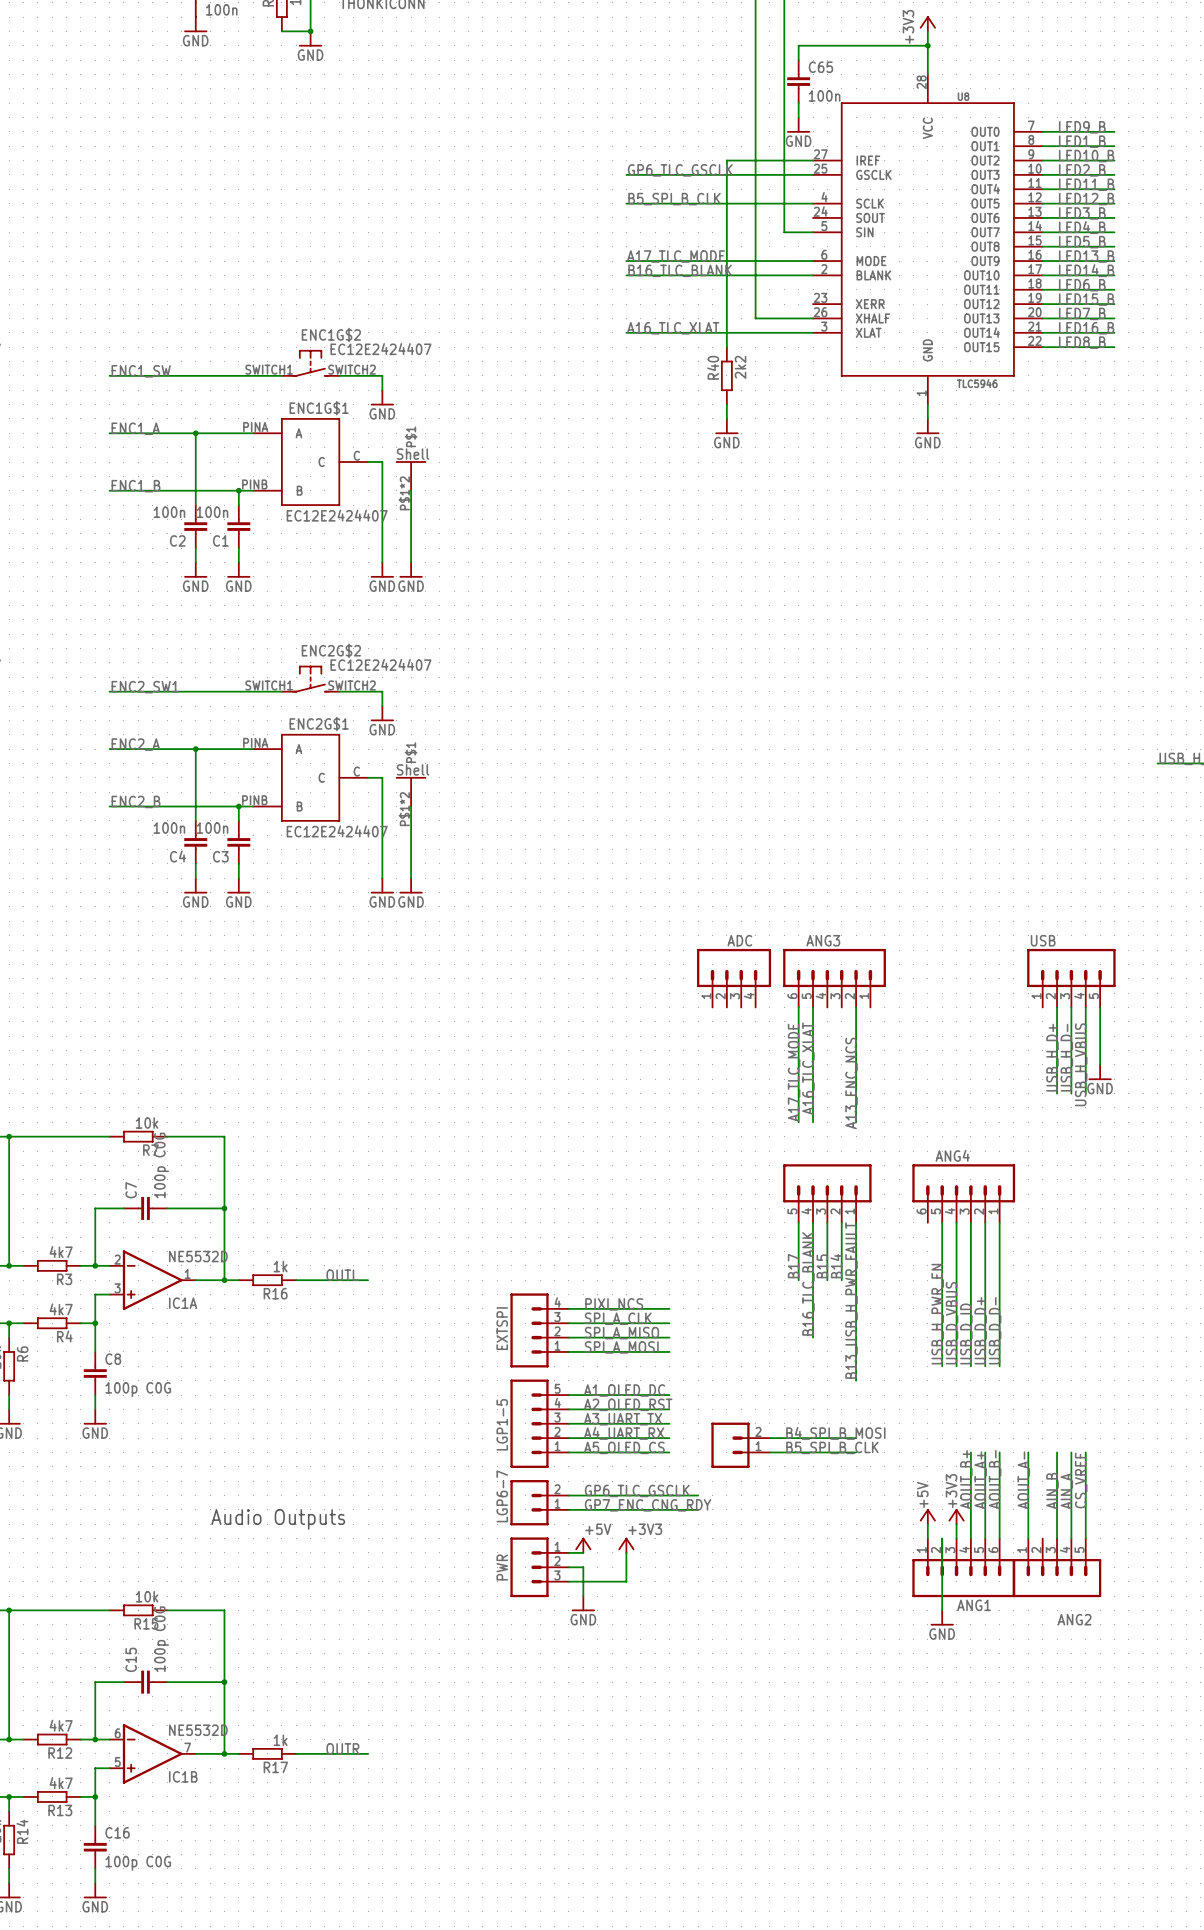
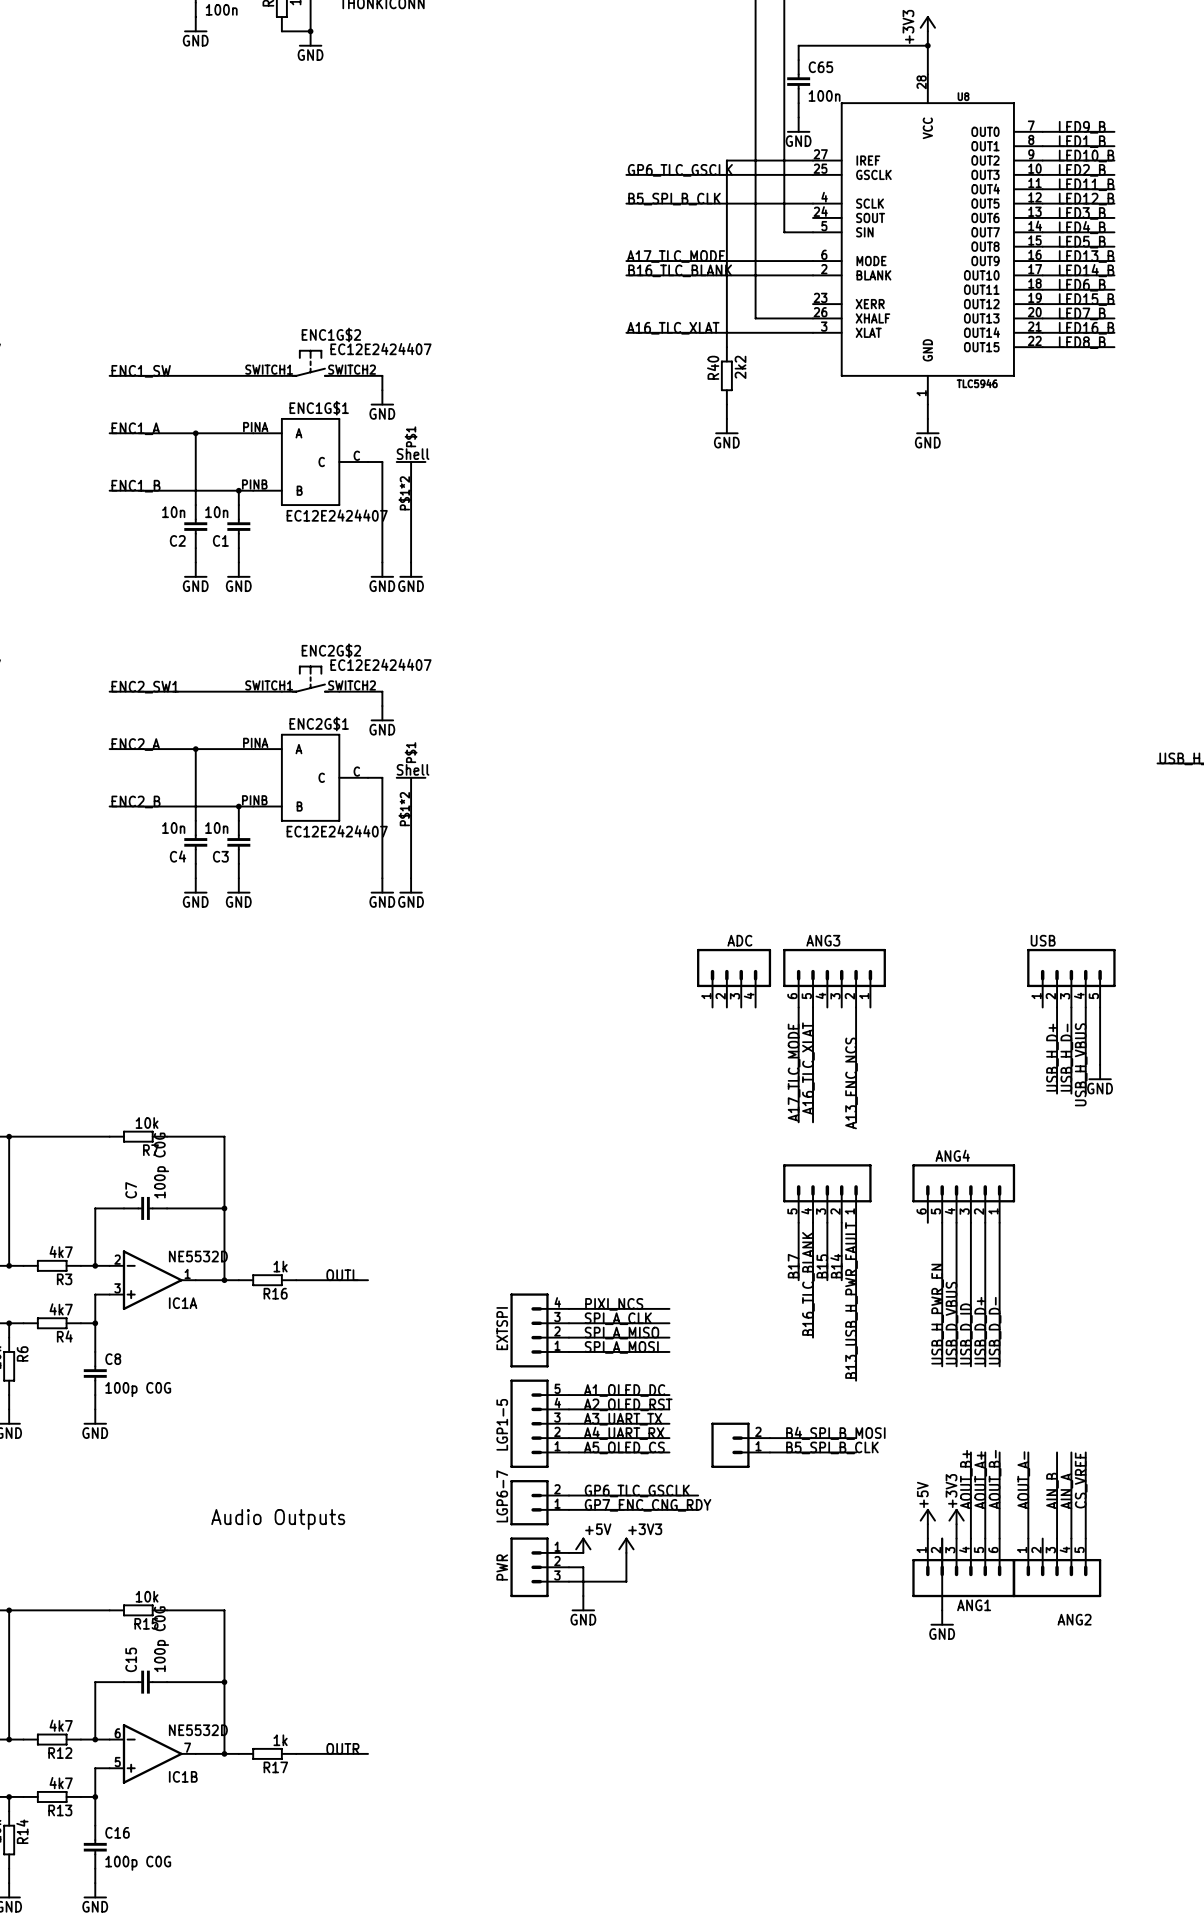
C2 value: 100n (169, 512) -> 10n (173, 512)
C1 value: 100n (212, 512) -> 10n (216, 512)
C4 value: 100n (169, 828) -> 10n (173, 828)
C3 value: 100n (212, 828) -> 10n (216, 828)

